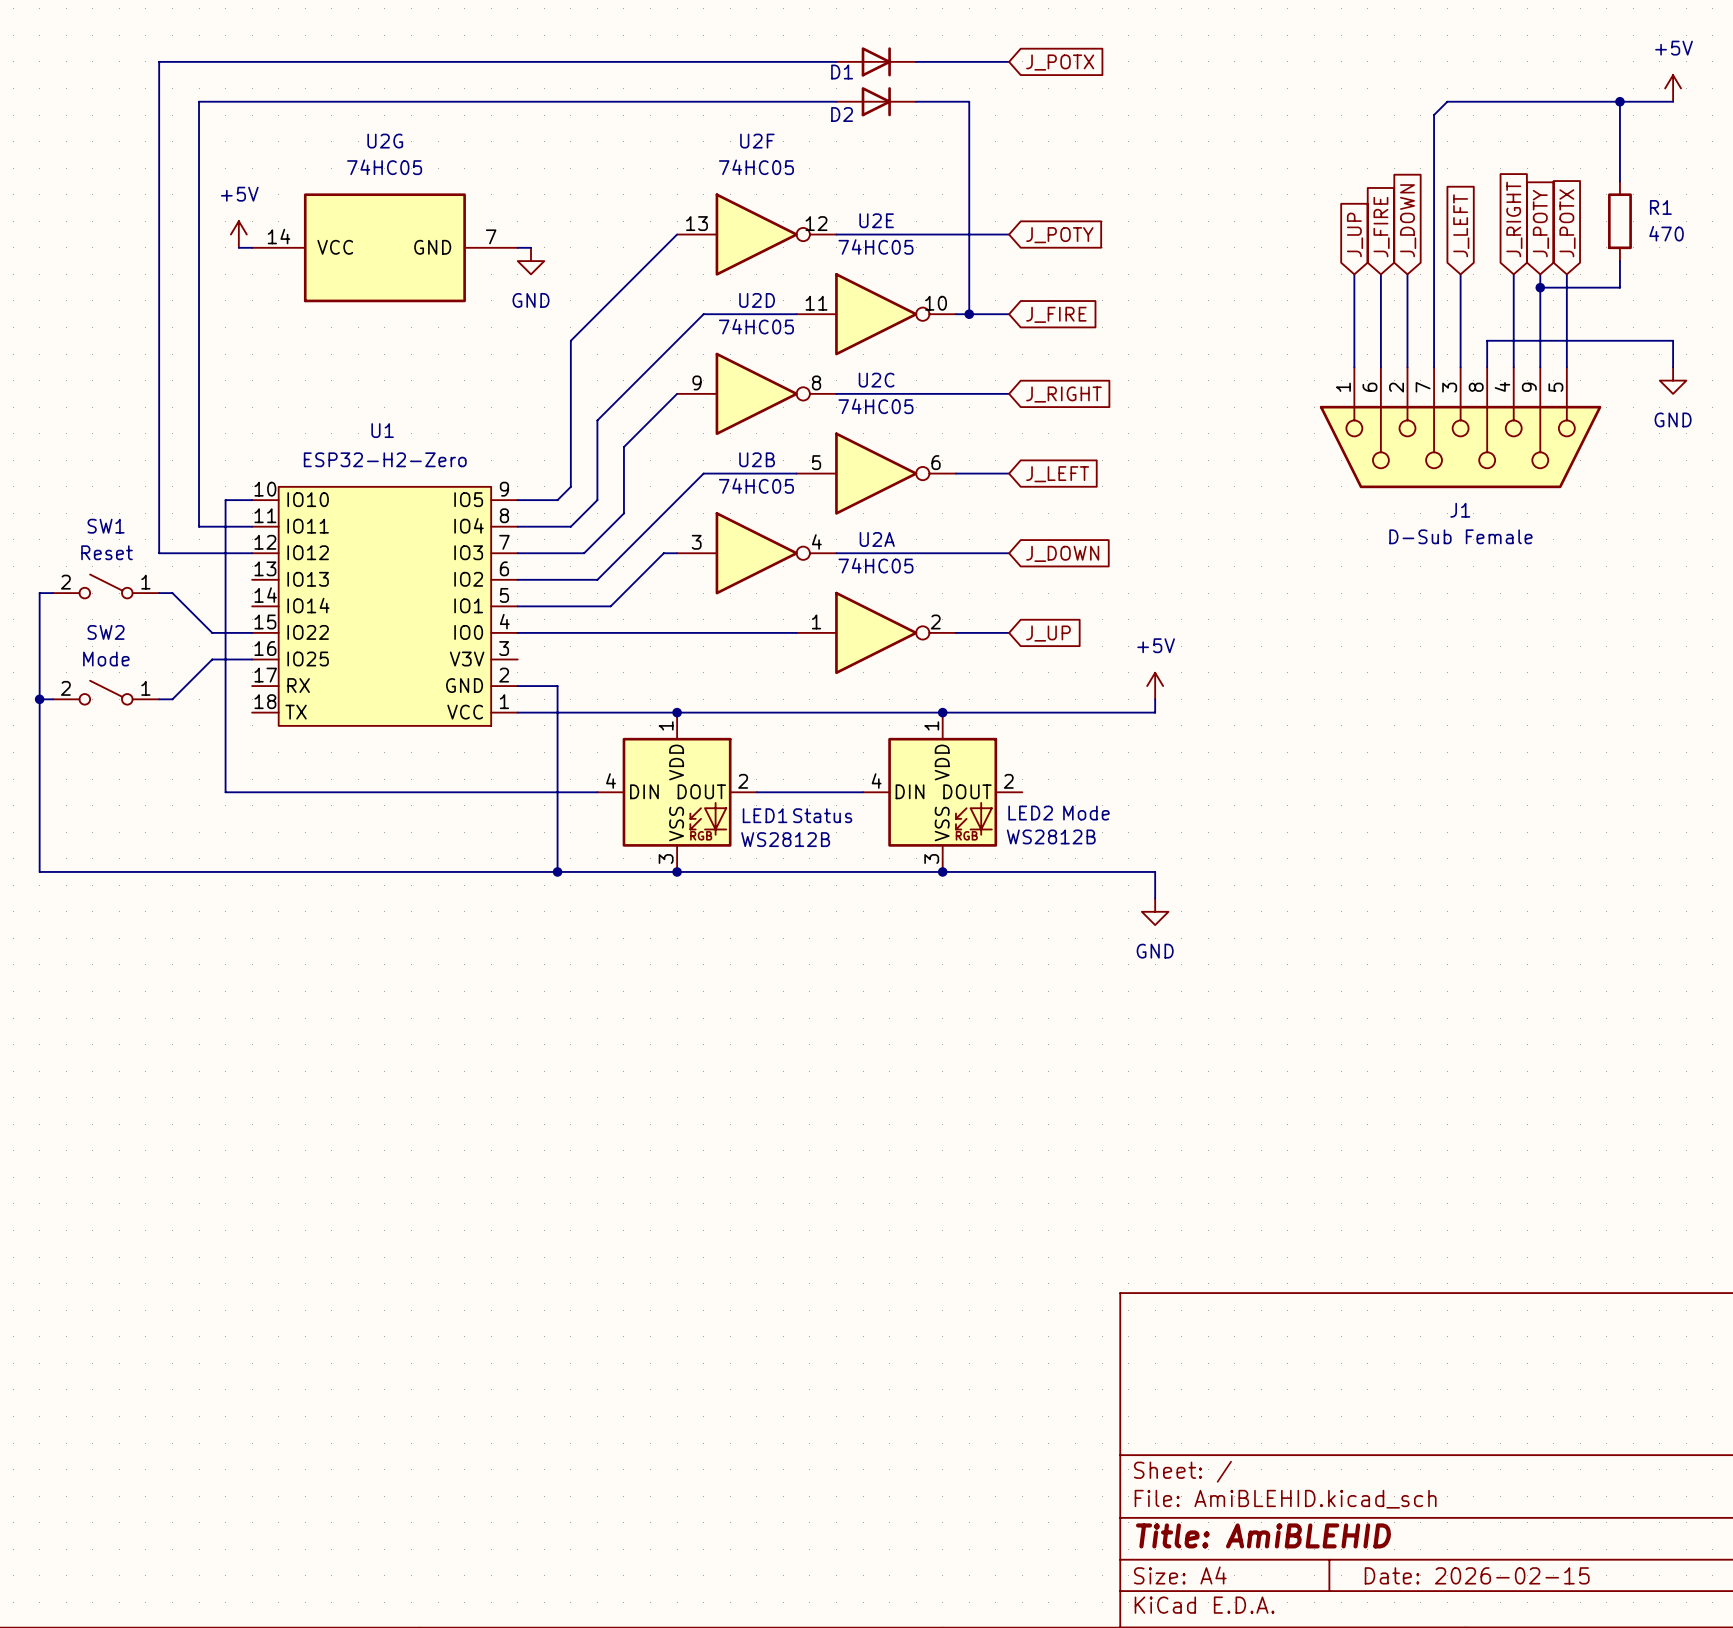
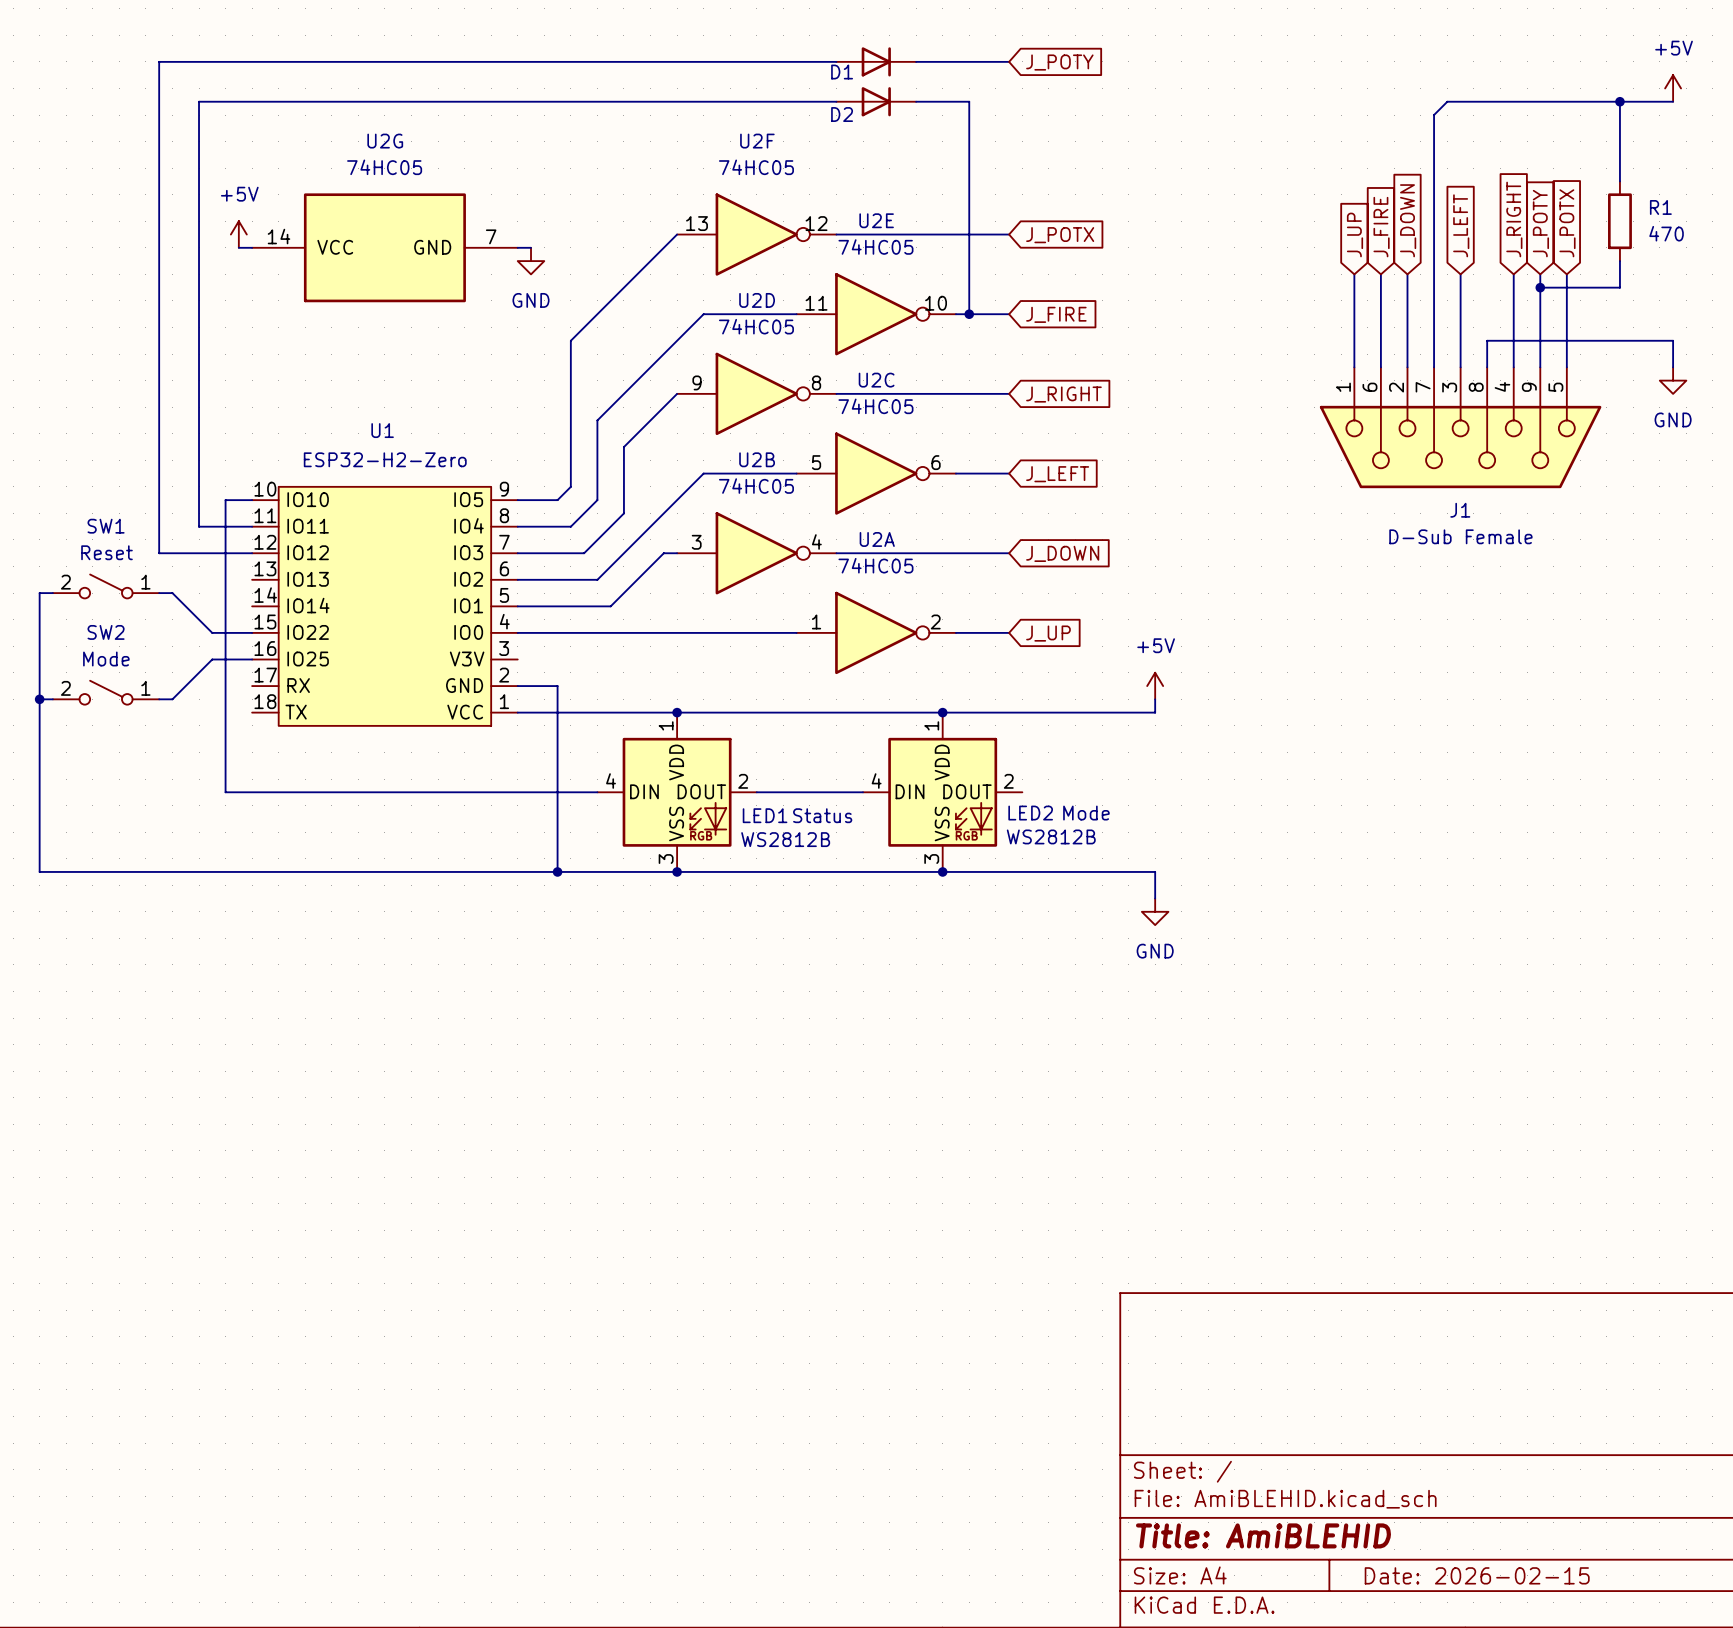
global label: J_POTX (1060, 62) -> J_POTY (1059, 62)
global label: J_POTY (1059, 235) -> J_POTX (1060, 235)

